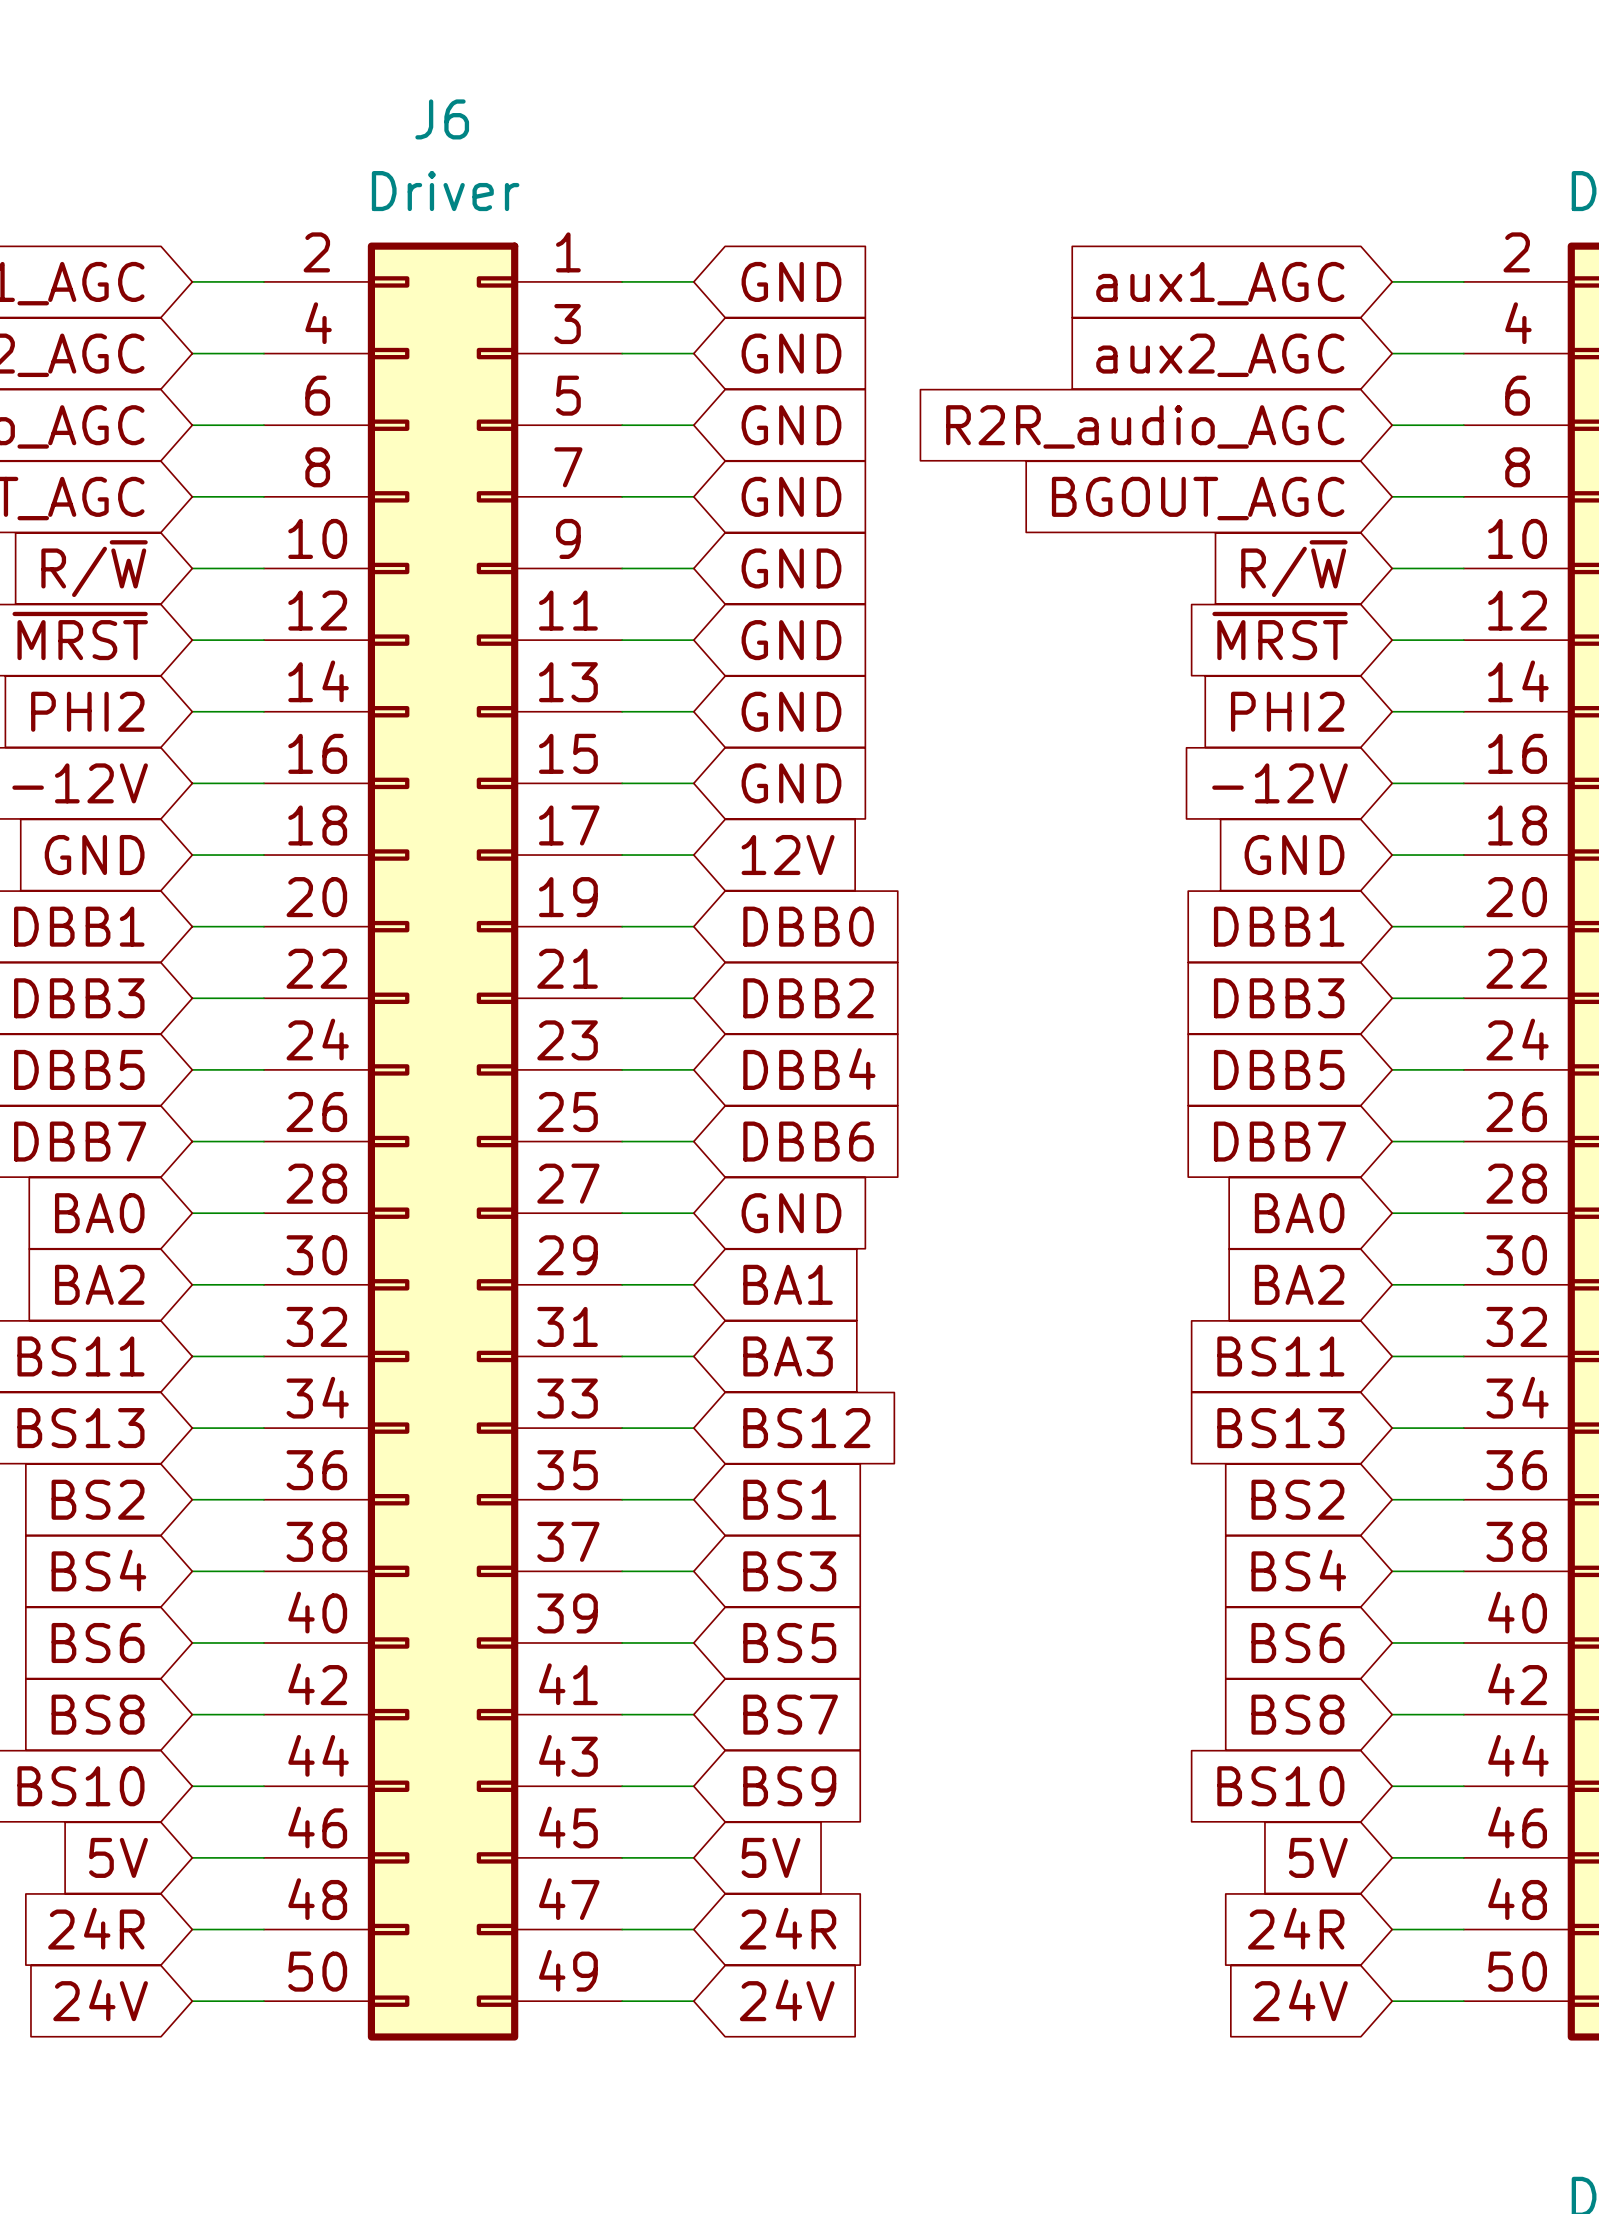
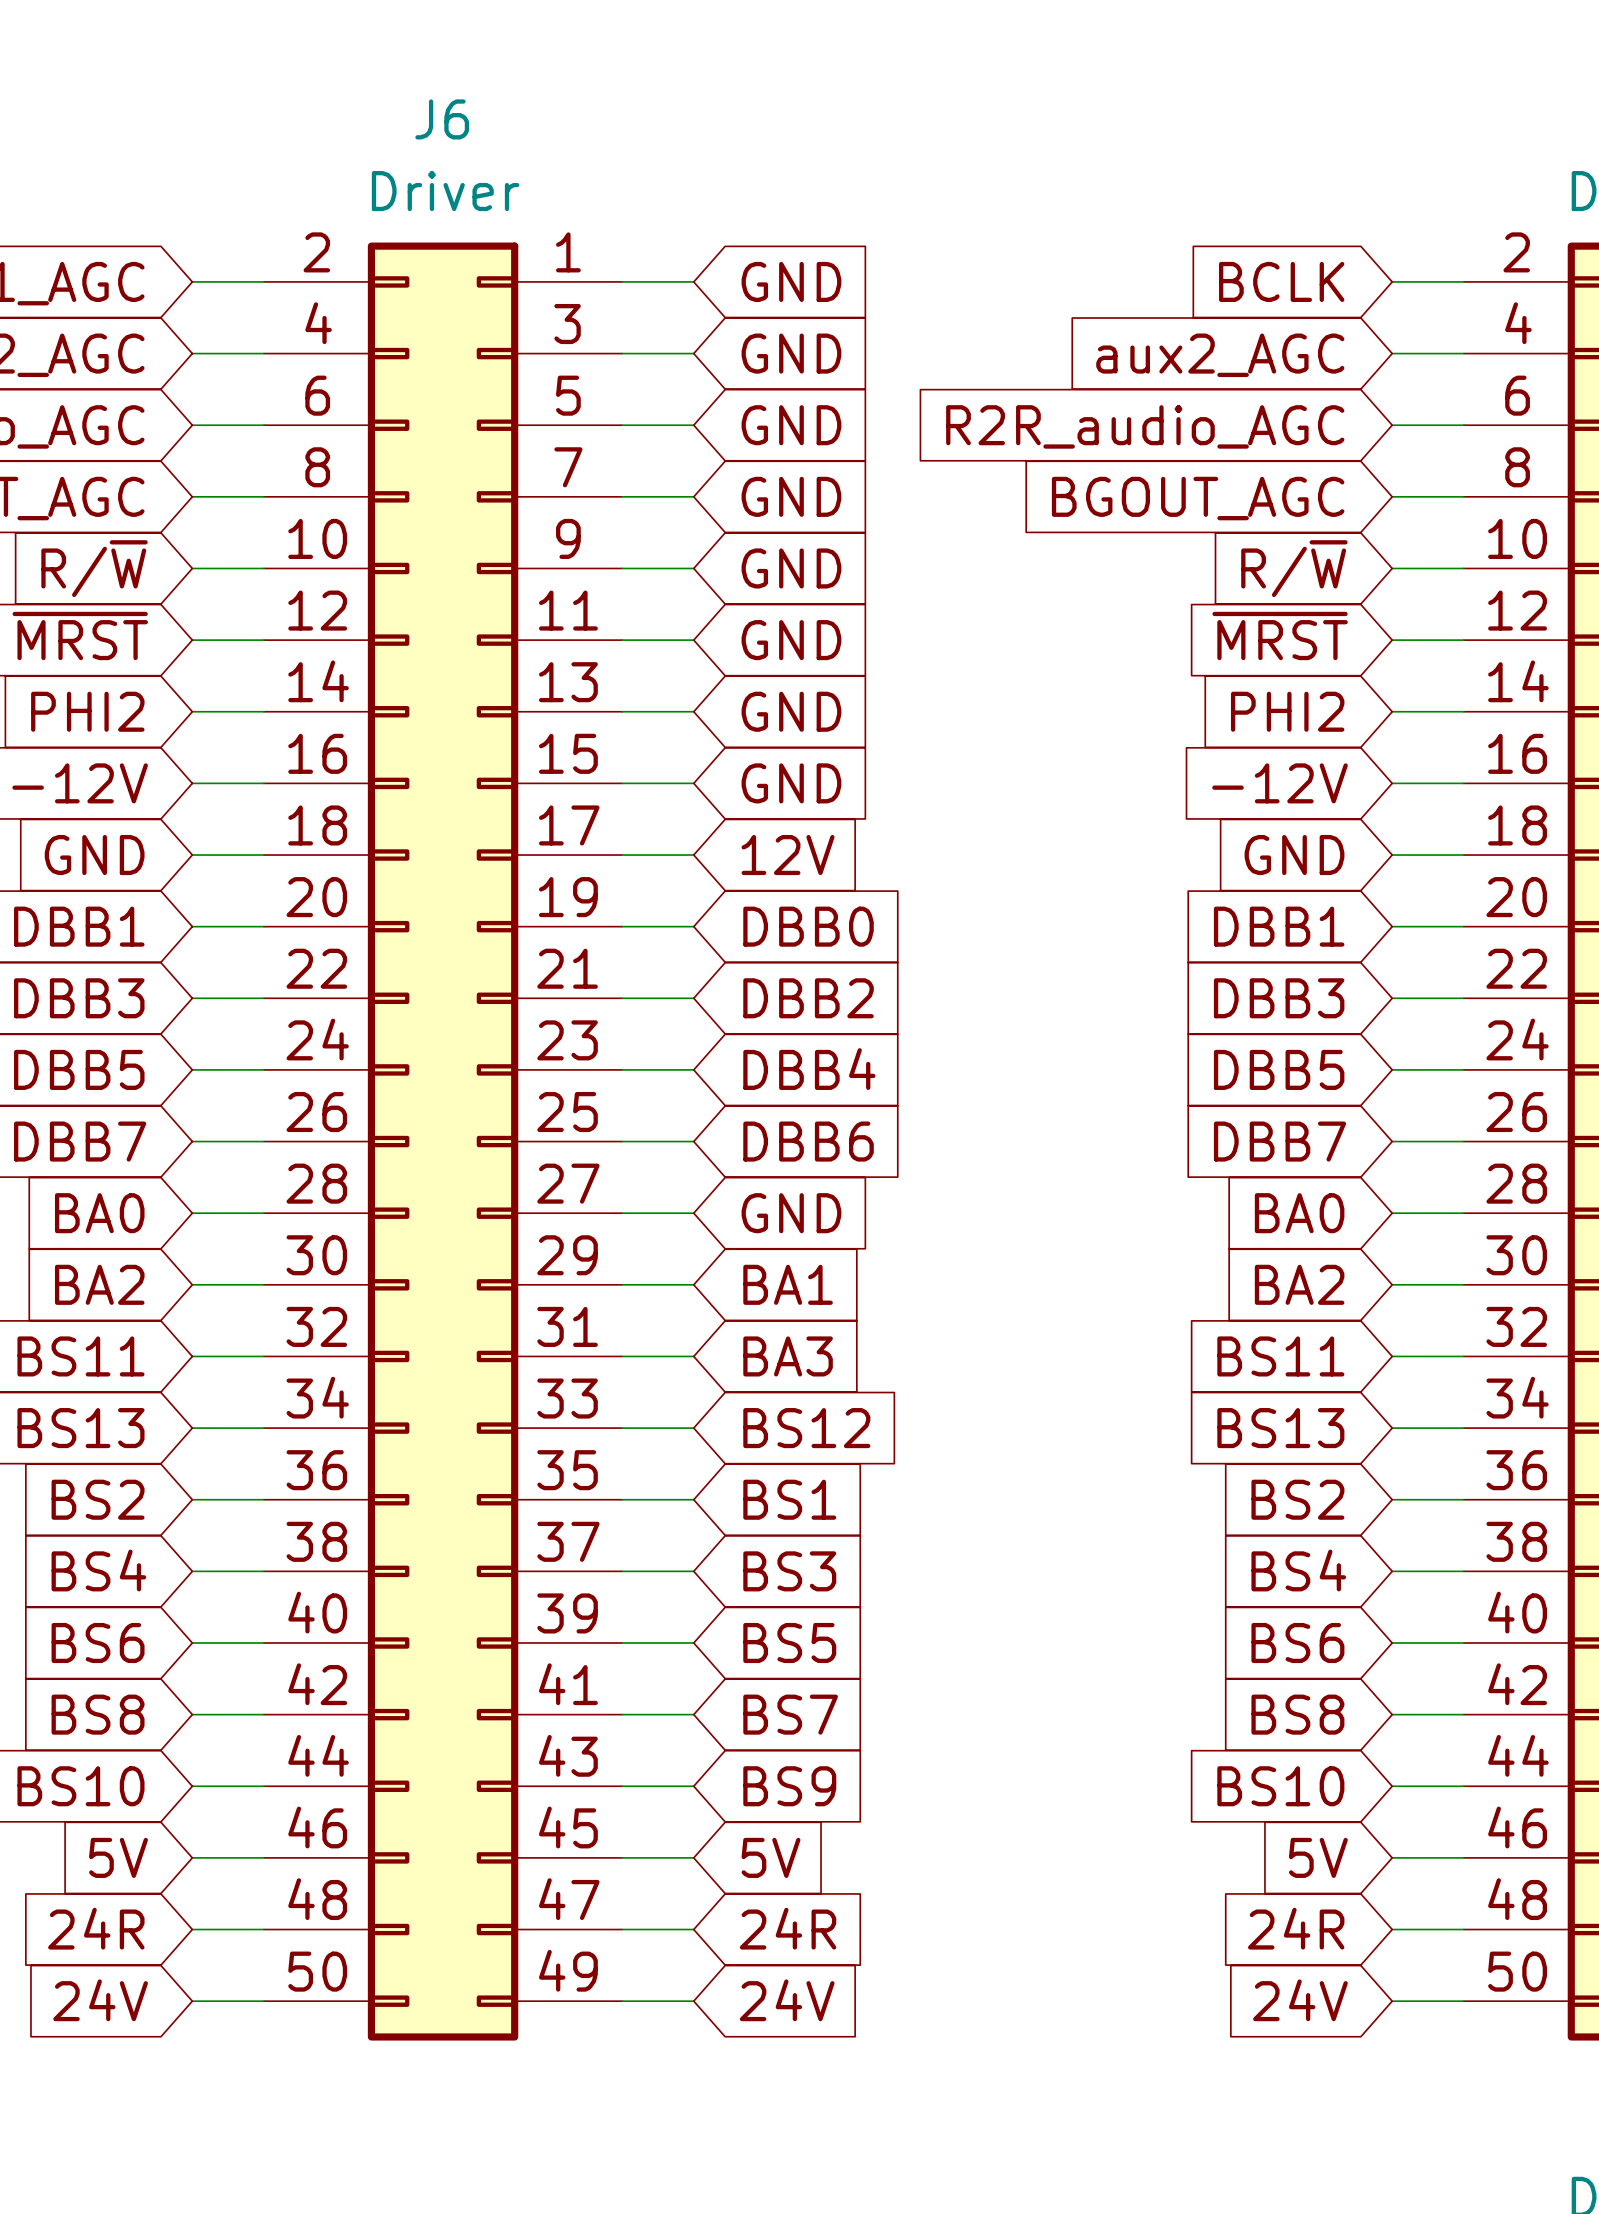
global label: aux1_AGC (1220, 283) -> BCLK (1281, 281)

